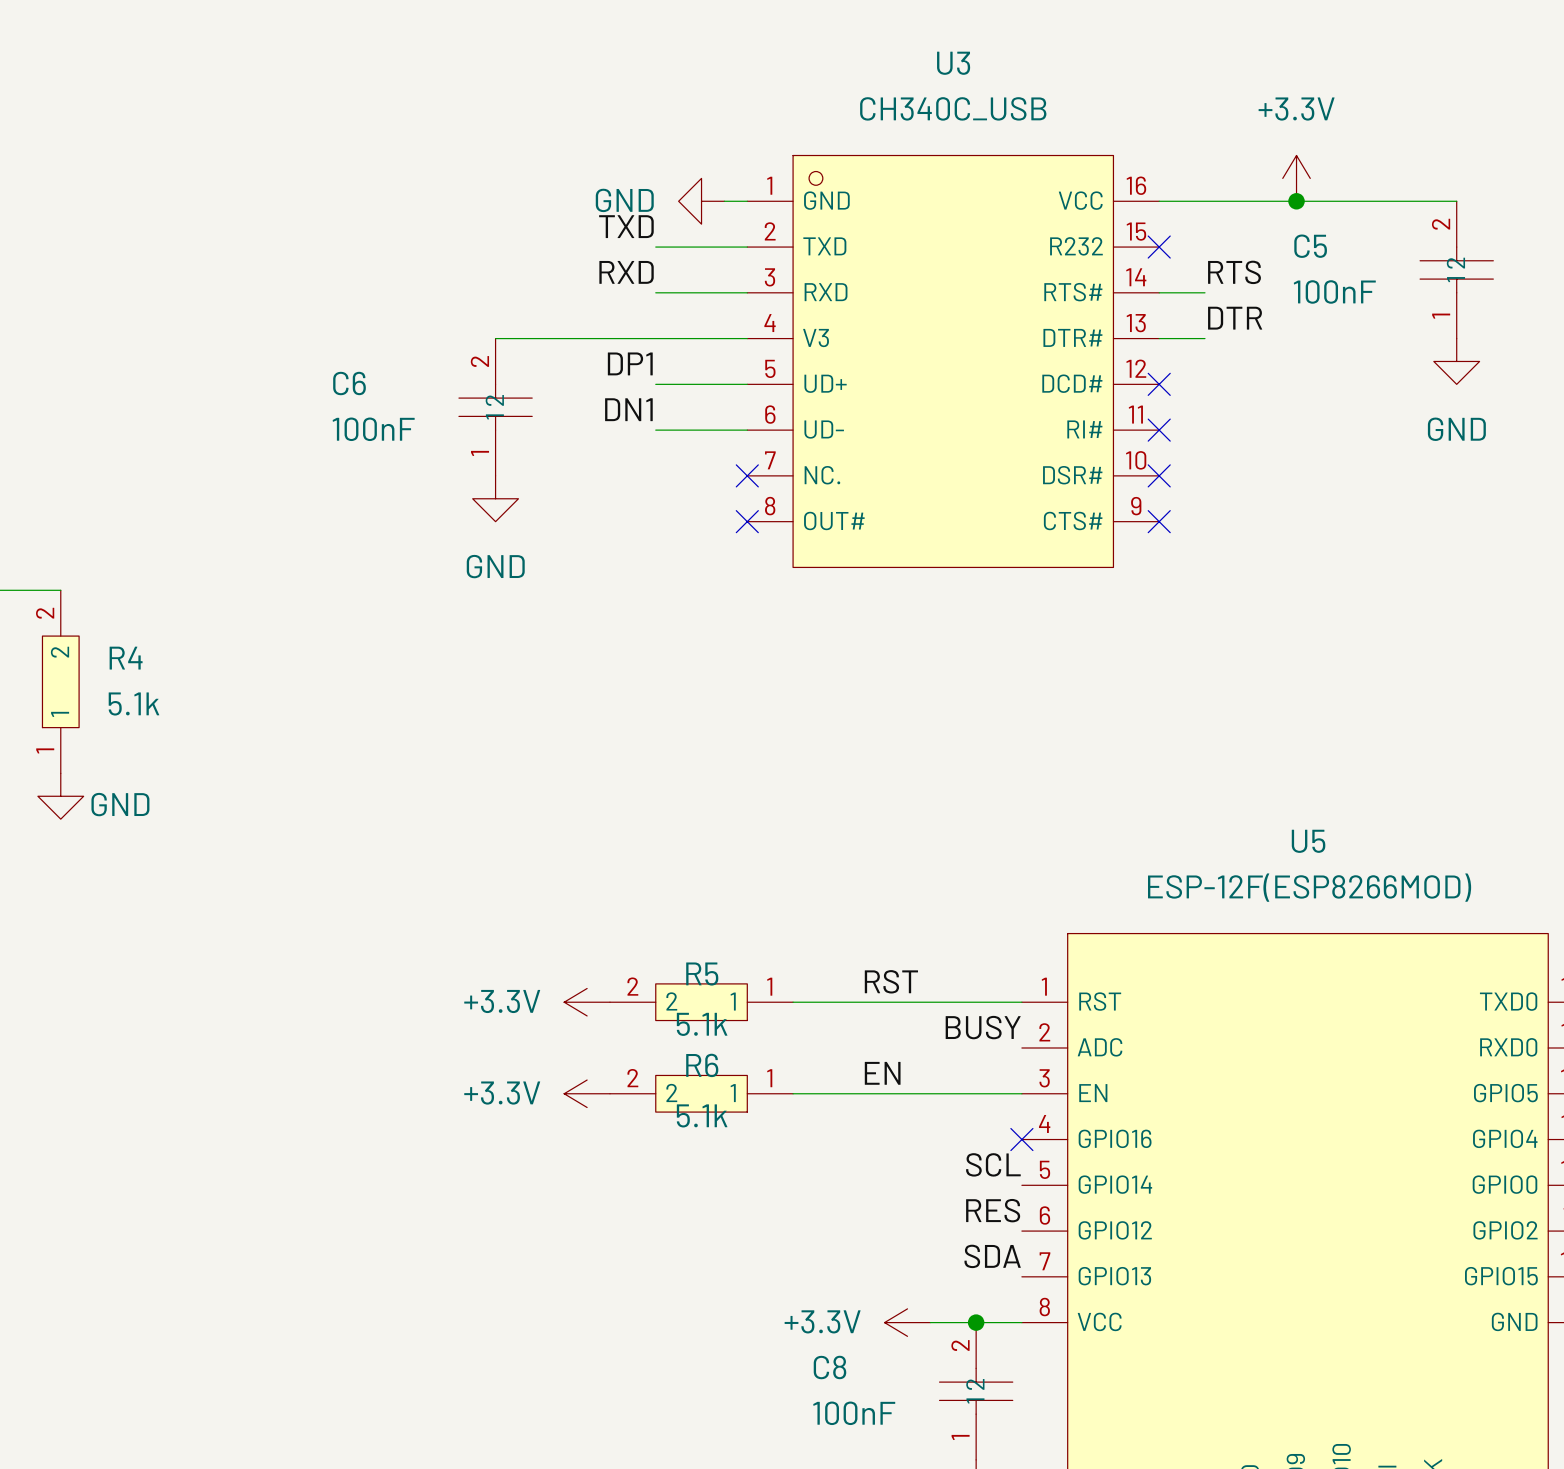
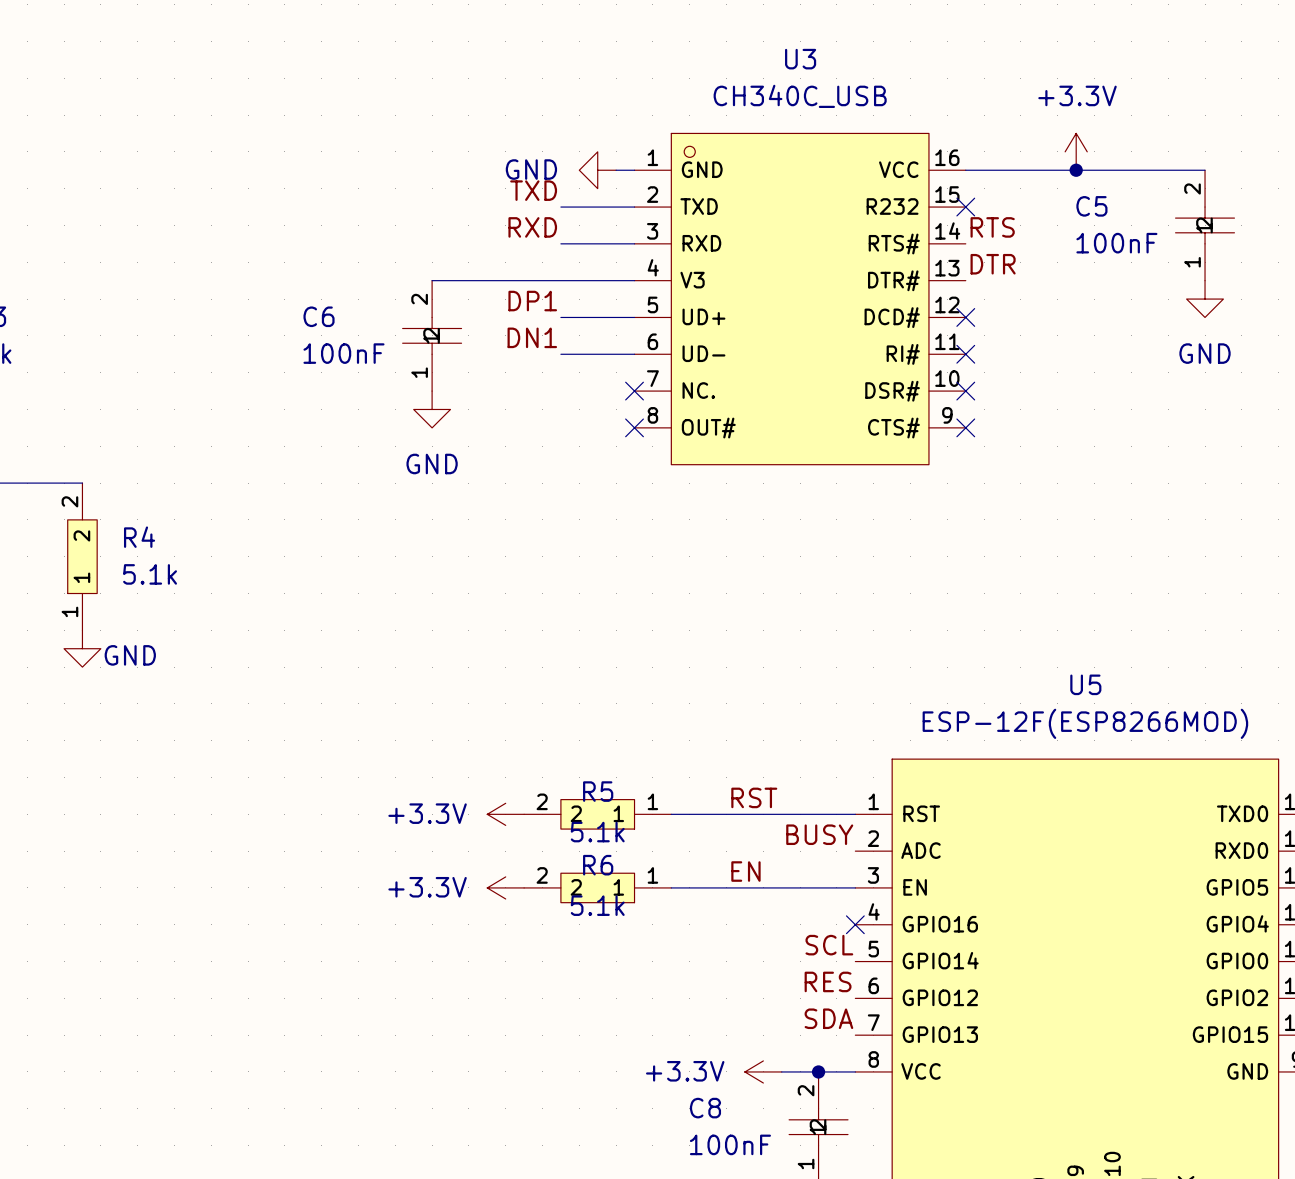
label position: RTS (1234, 272) -> RTS (992, 227)
wire: (1159, 292) (1204, 292) -> none
label position: DTR (1235, 318) -> DTR (993, 264)
wire: (1159, 338) (1204, 338) -> none

